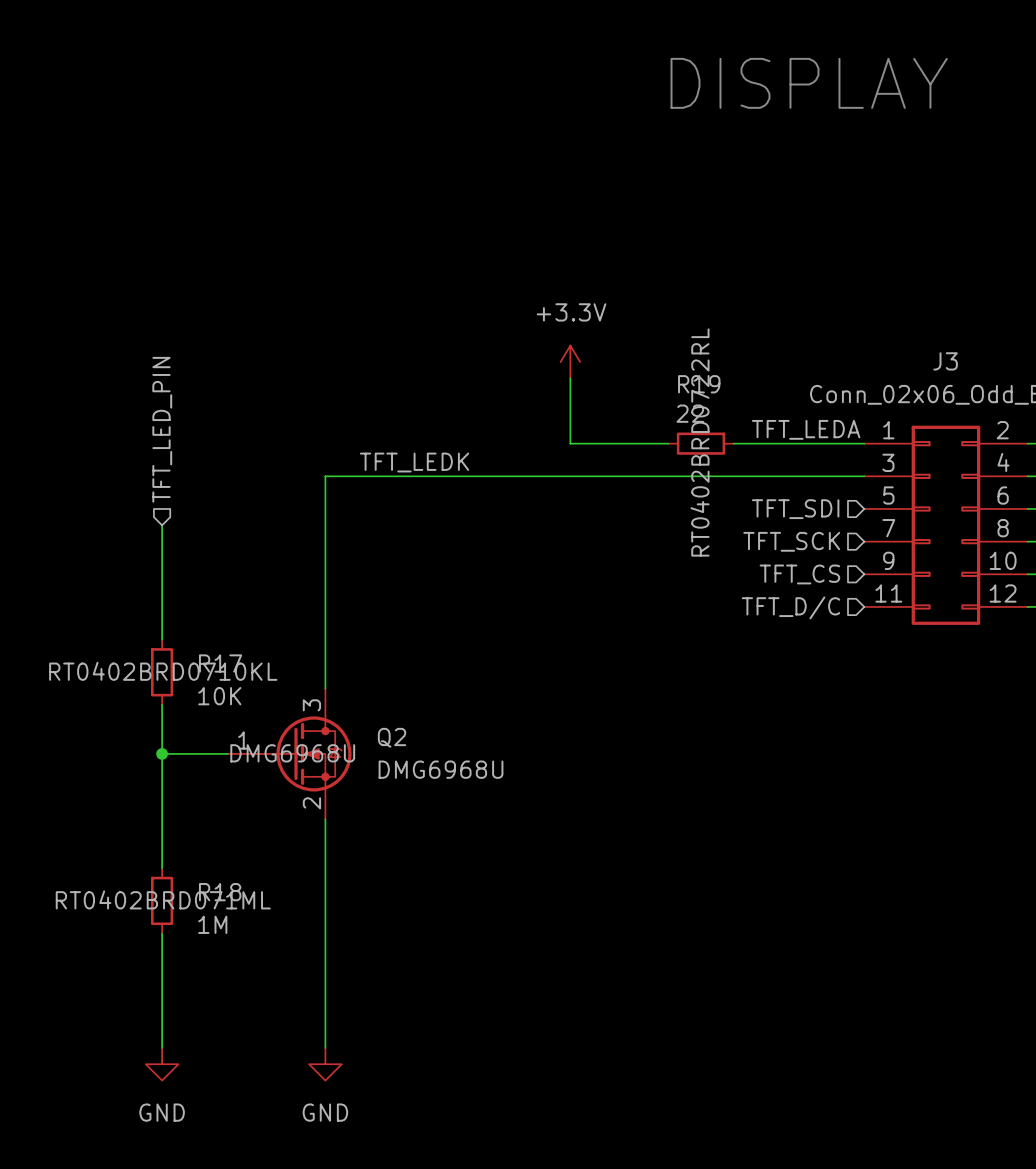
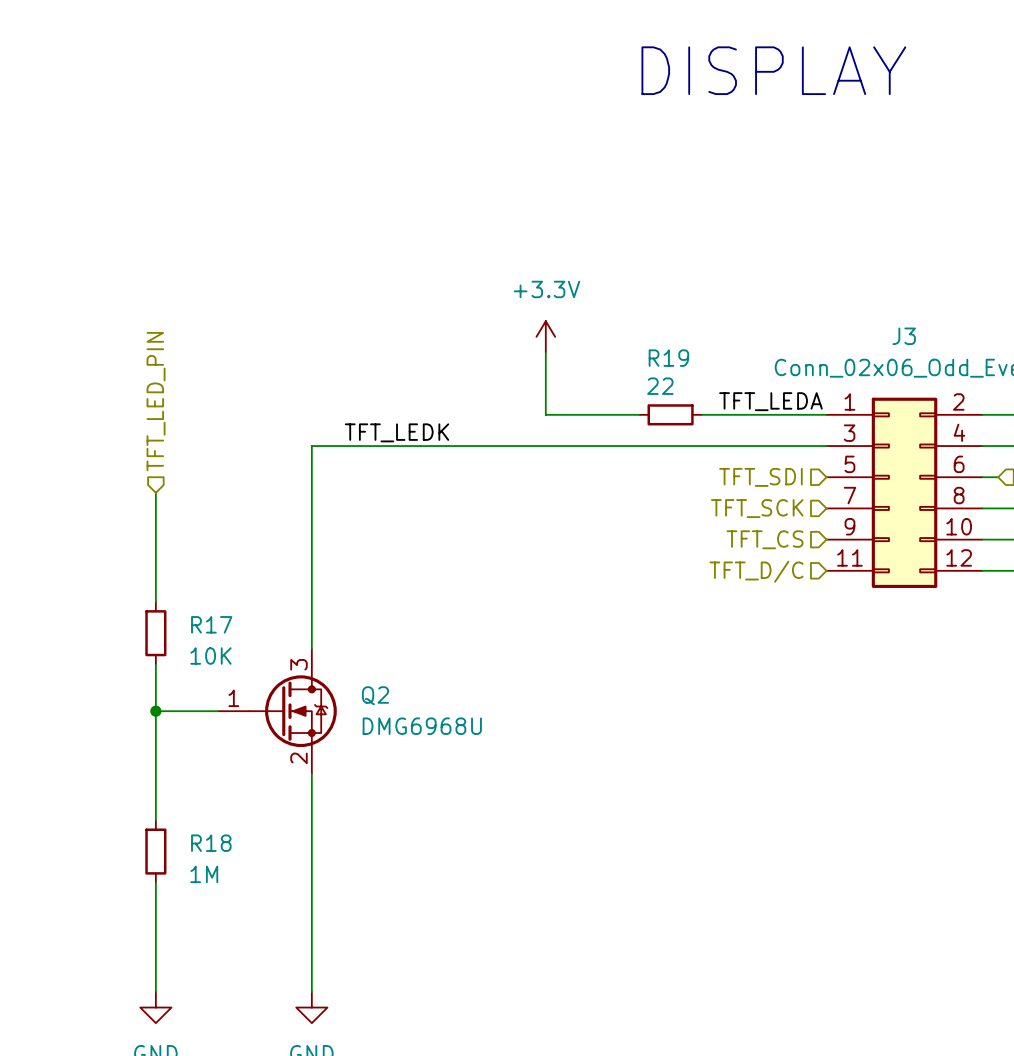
R19 text: RT0402BRD0722RL (700, 442) -> none
R17 text: RT0402BRD0710KL (163, 671) -> none
Q2 text: DMG6968U (292, 753) -> none
R18 text: RT0402BRD071ML (163, 899) -> none

